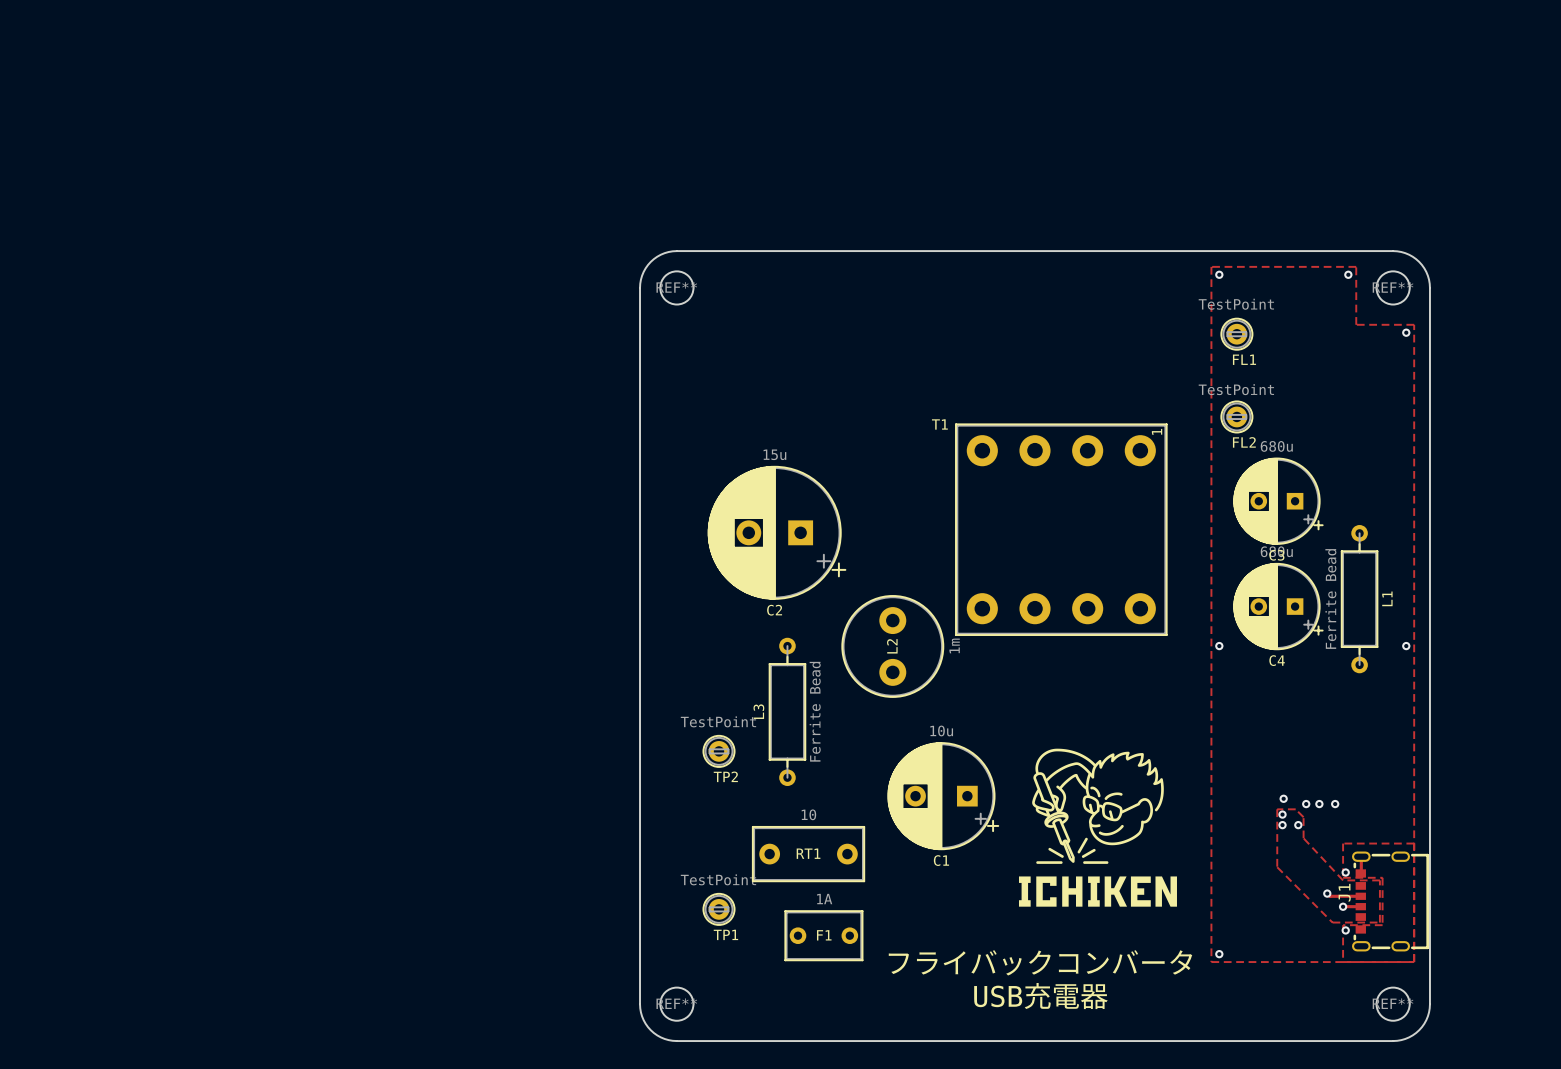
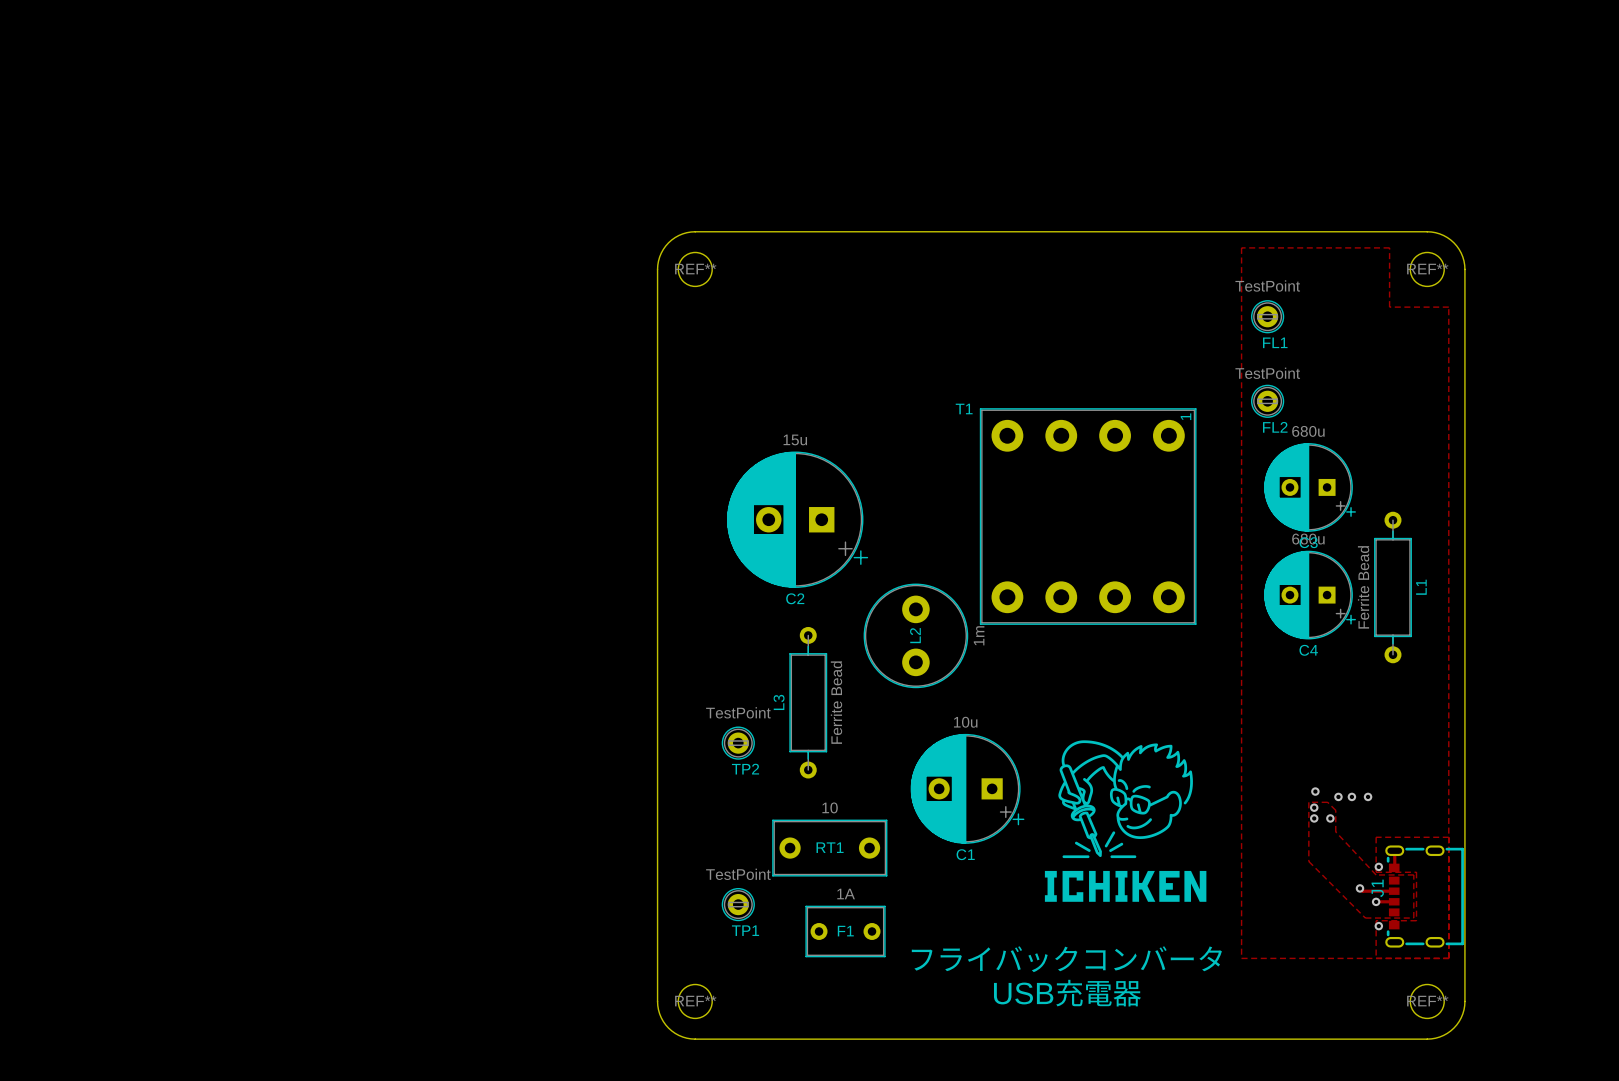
via: (1219, 274) -> none
via: (1348, 274) -> none
via: (1406, 332) -> none
via: (1219, 646) -> none
via: (1406, 646) -> none
via: (1219, 954) -> none

